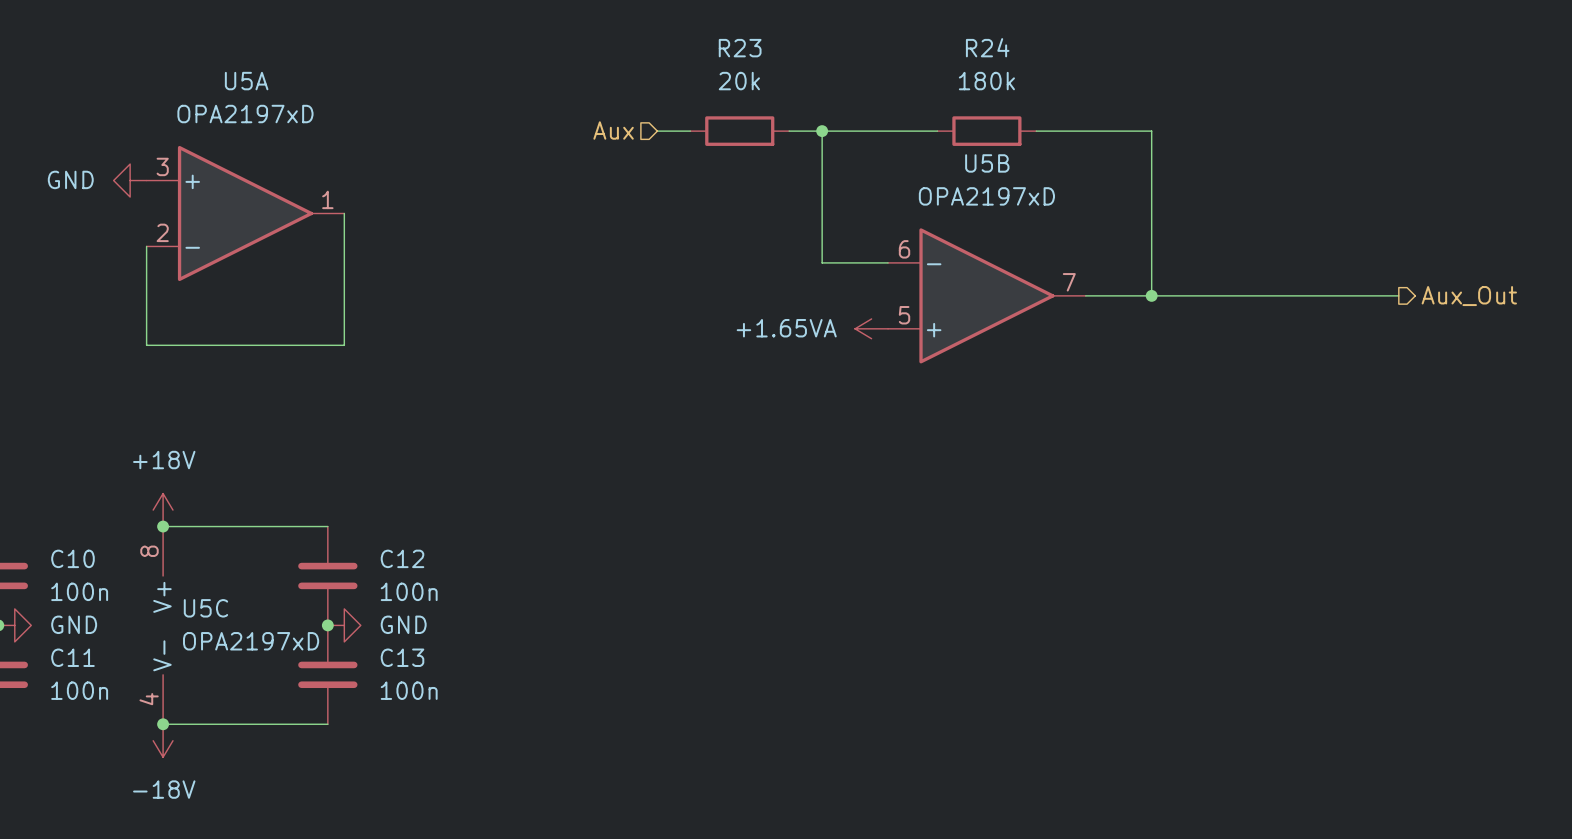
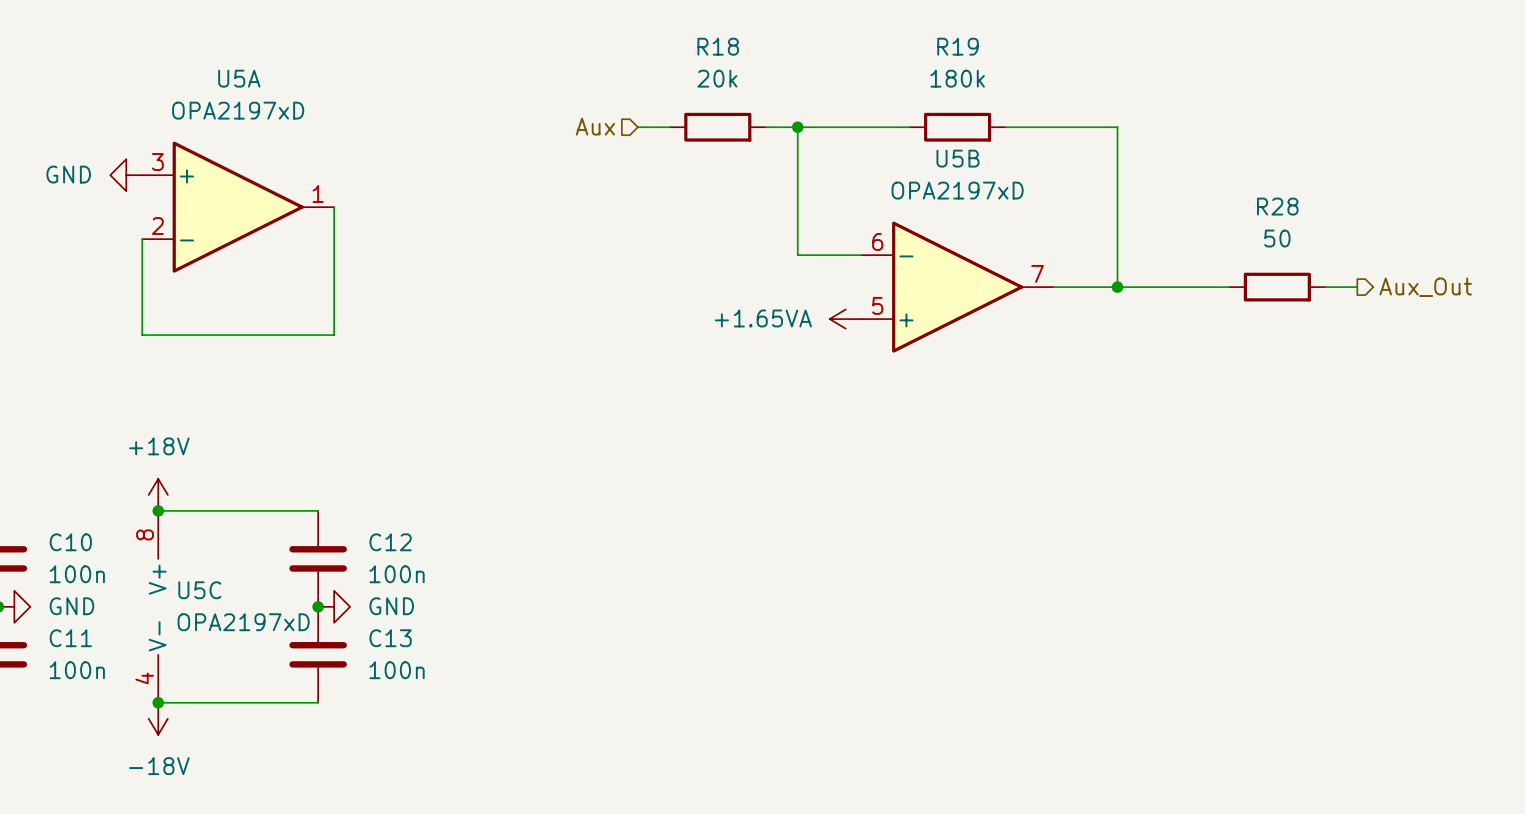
R24 name: R24 (987, 47) -> R19 (958, 46)
R23 name: R23 (740, 48) -> R18 (718, 46)
wire: (1267, 295) (1365, 295) -> none
R28: none -> 50 (1277, 287)

